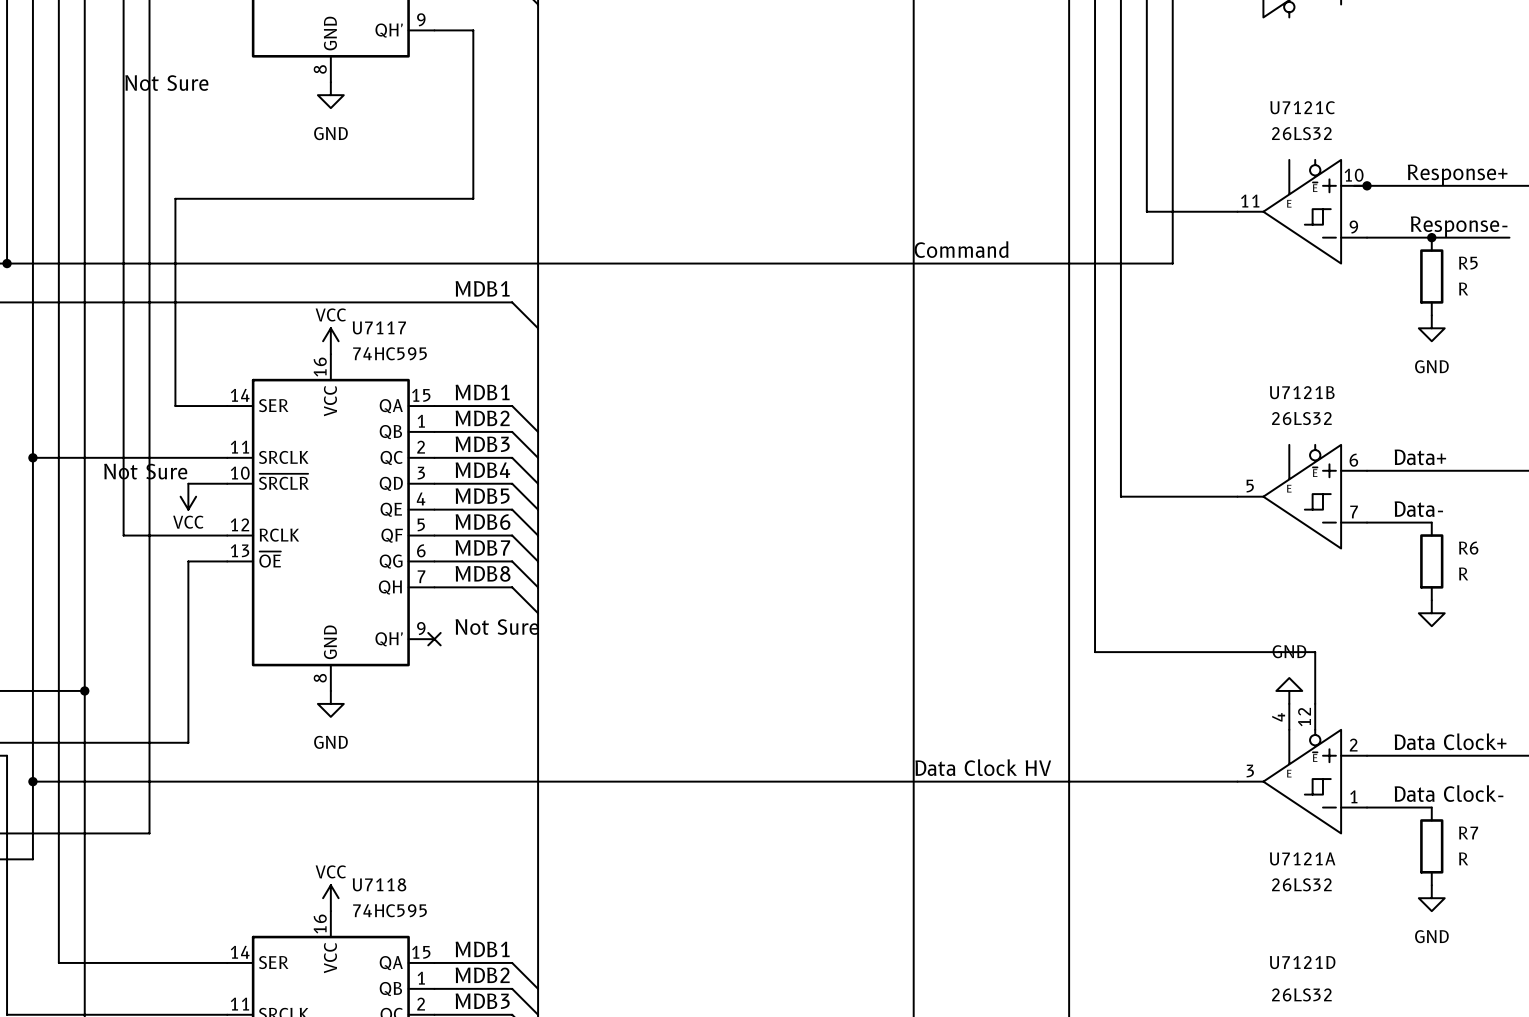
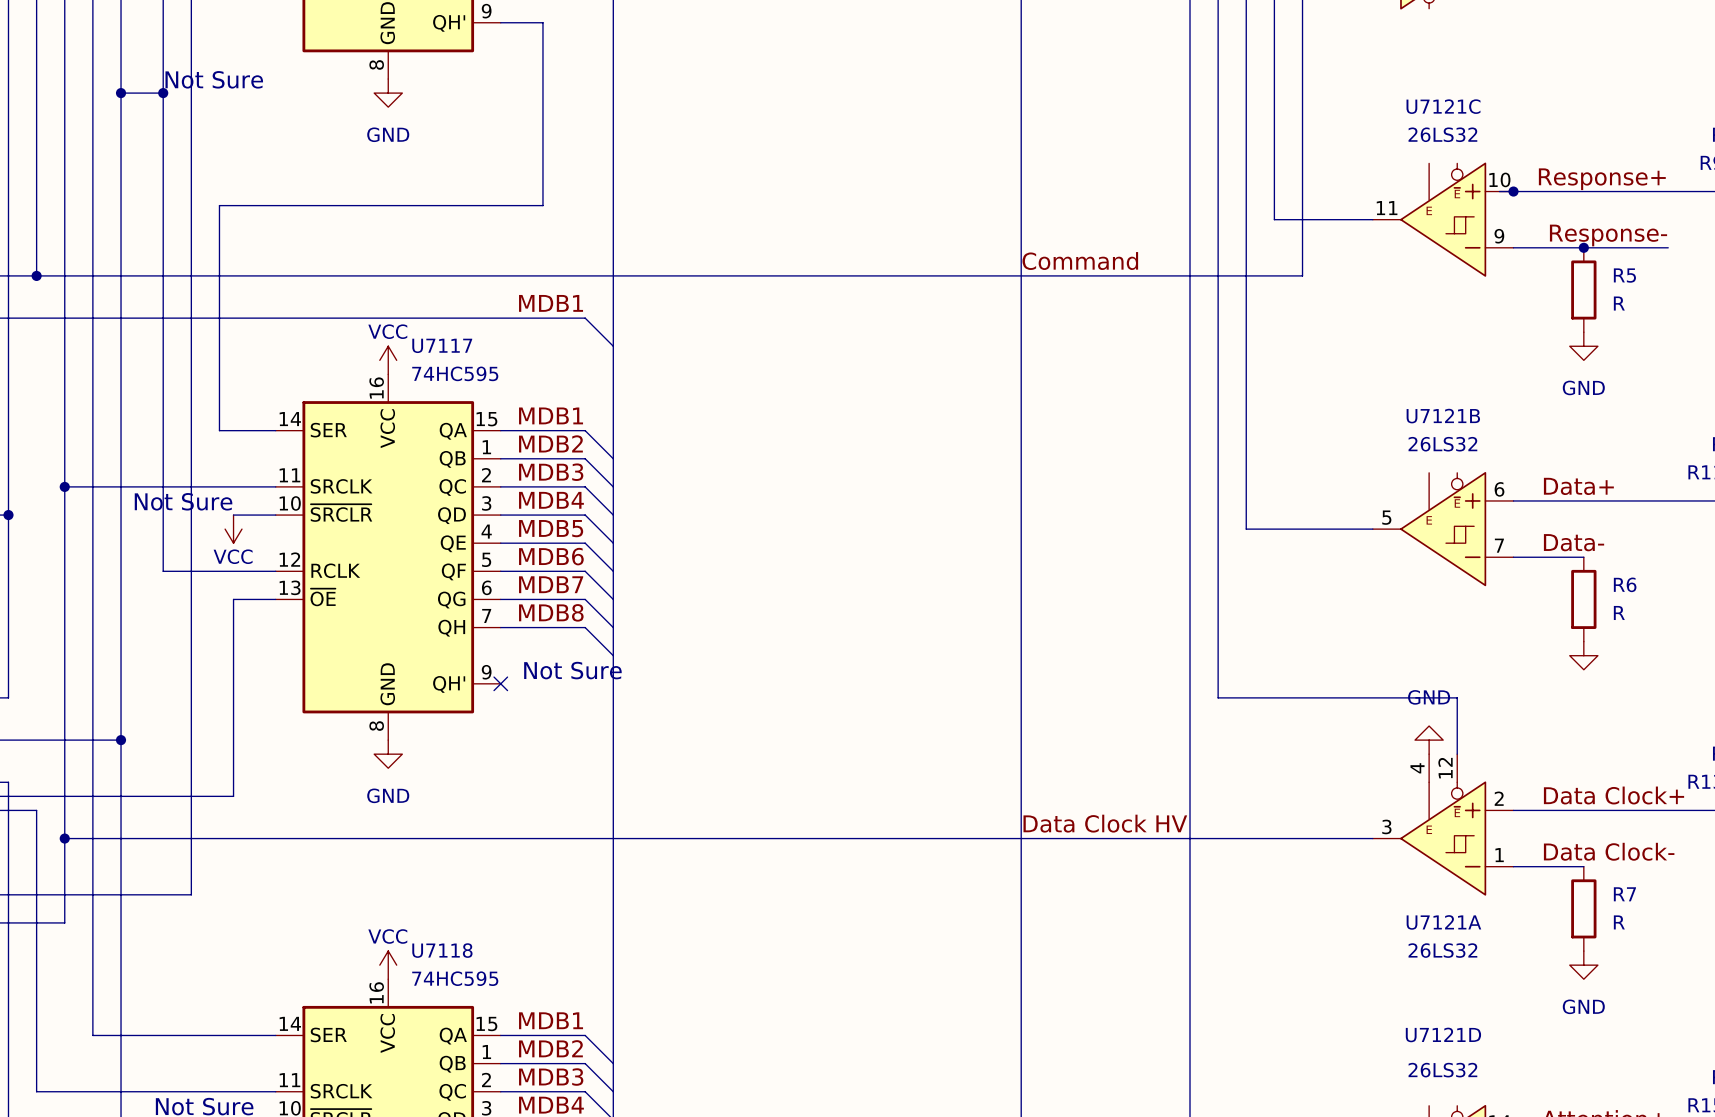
wire: none -> (121, 93) (163, 93)
junction: none -> (121, 93)
junction: none -> (163, 93)

